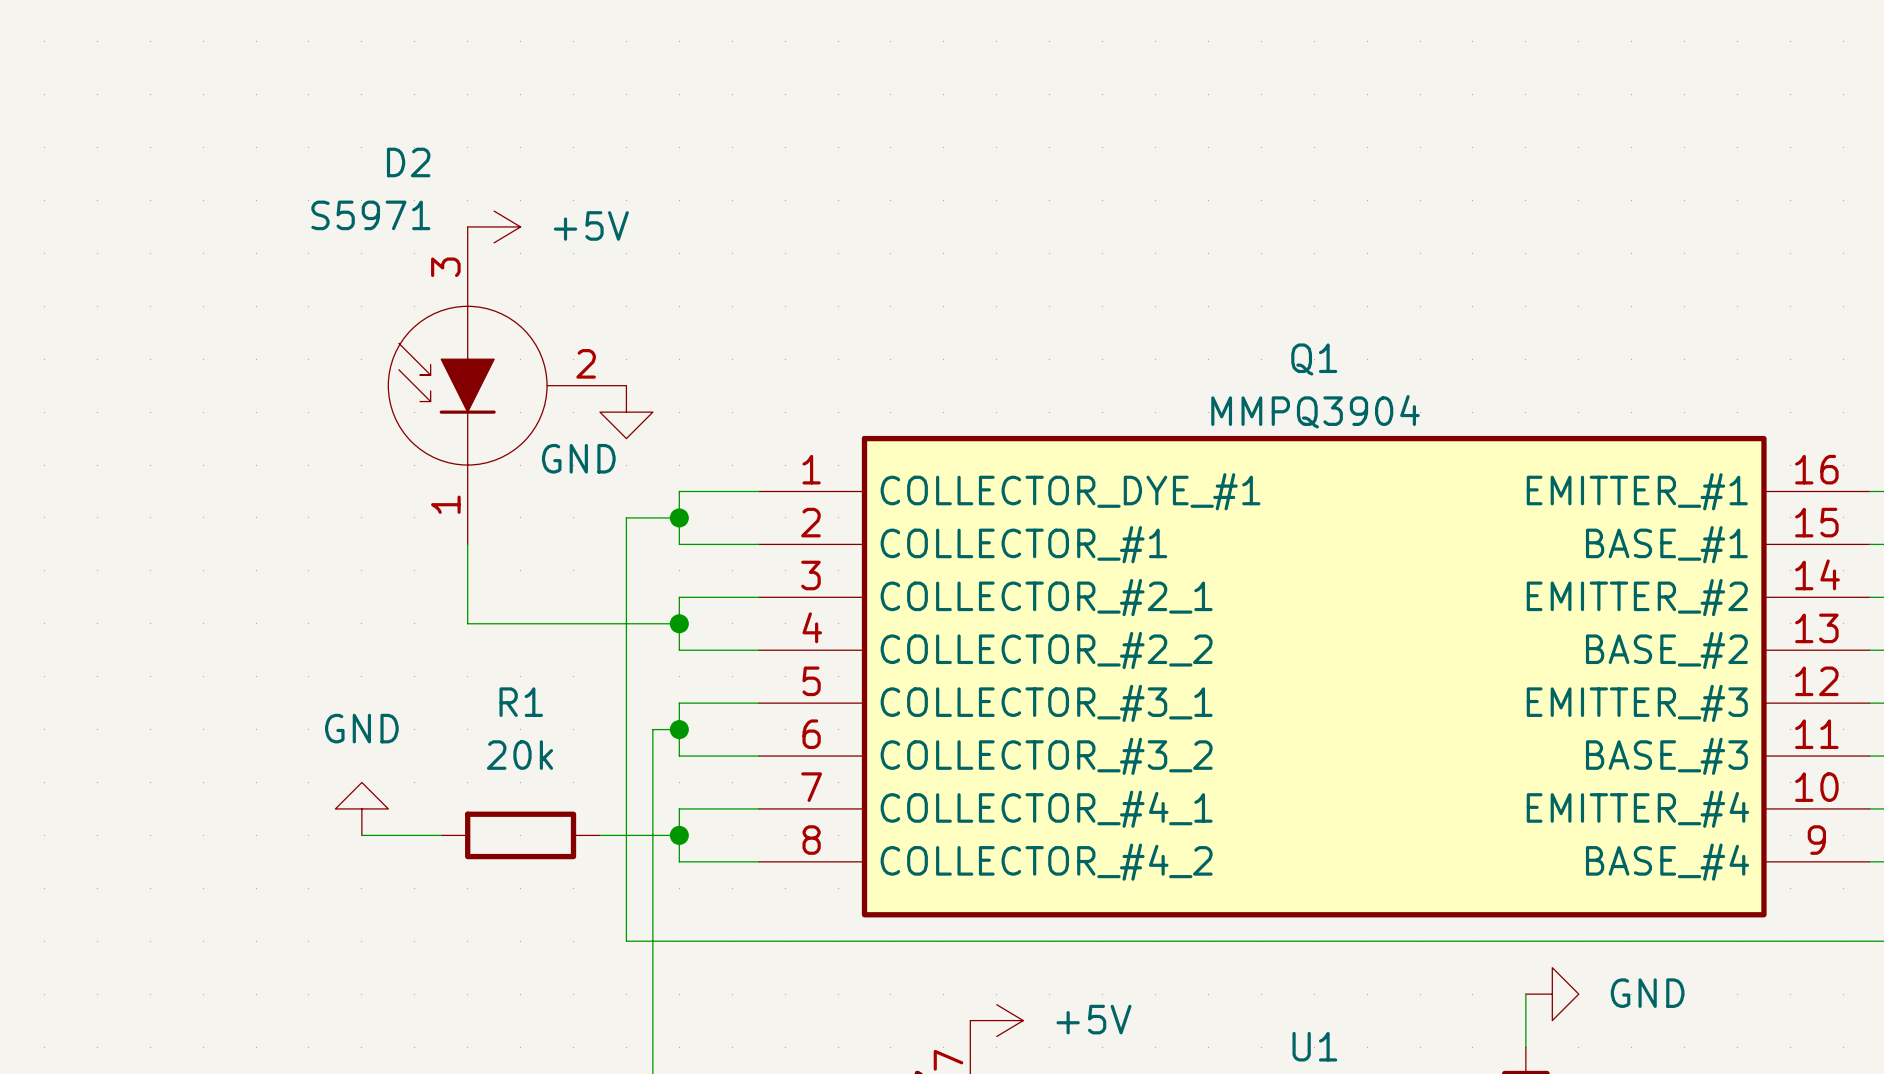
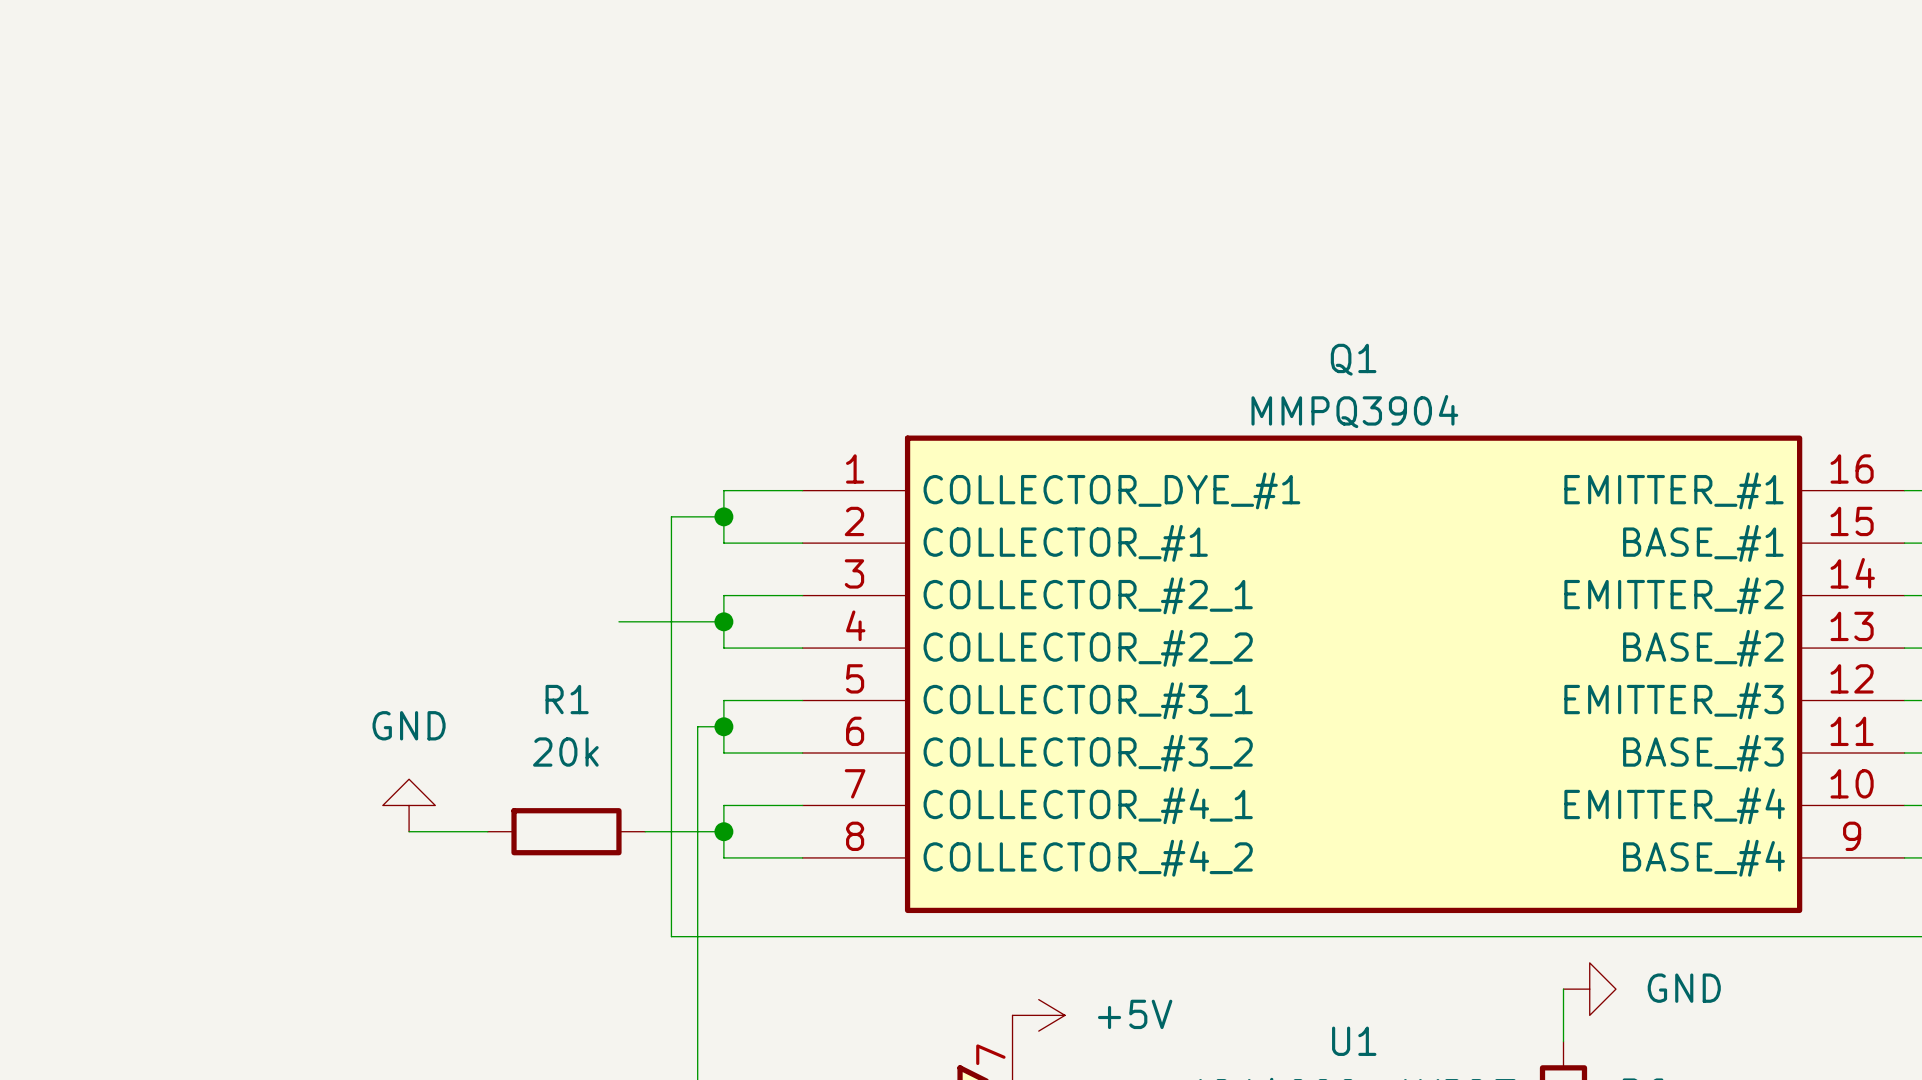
power symbol: +5V (494, 226) -> none
D2: S5971 (507, 385) -> none
power symbol: GND (626, 412) -> none
wire: (467, 544) (467, 623) (573, 623) -> none

